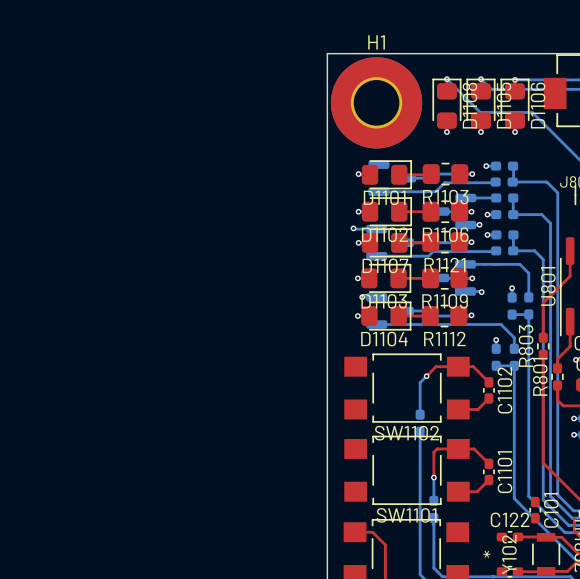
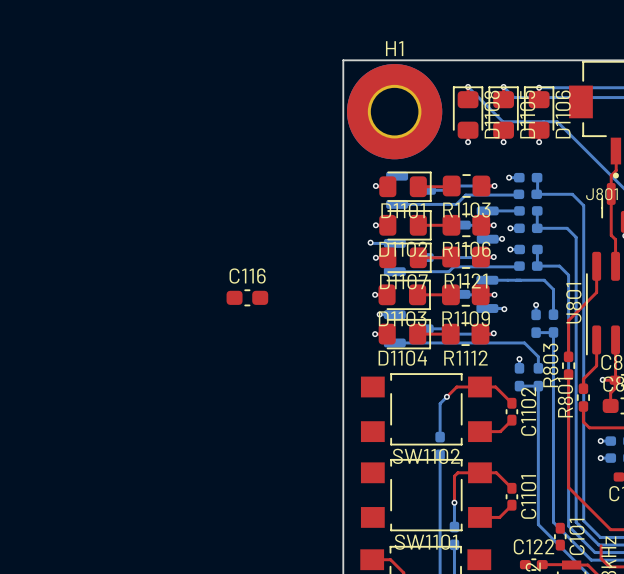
C116: none -> (247, 297)

